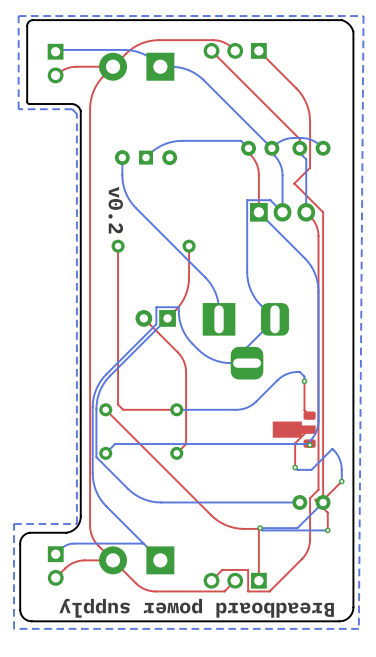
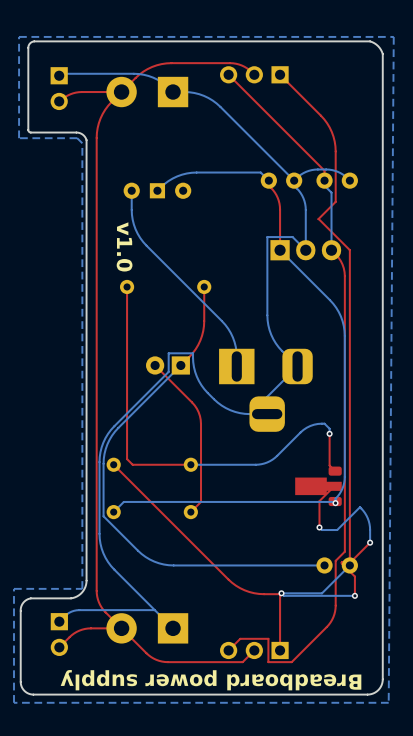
text: v0.2 (115, 210) -> v1.0 (124, 246)

